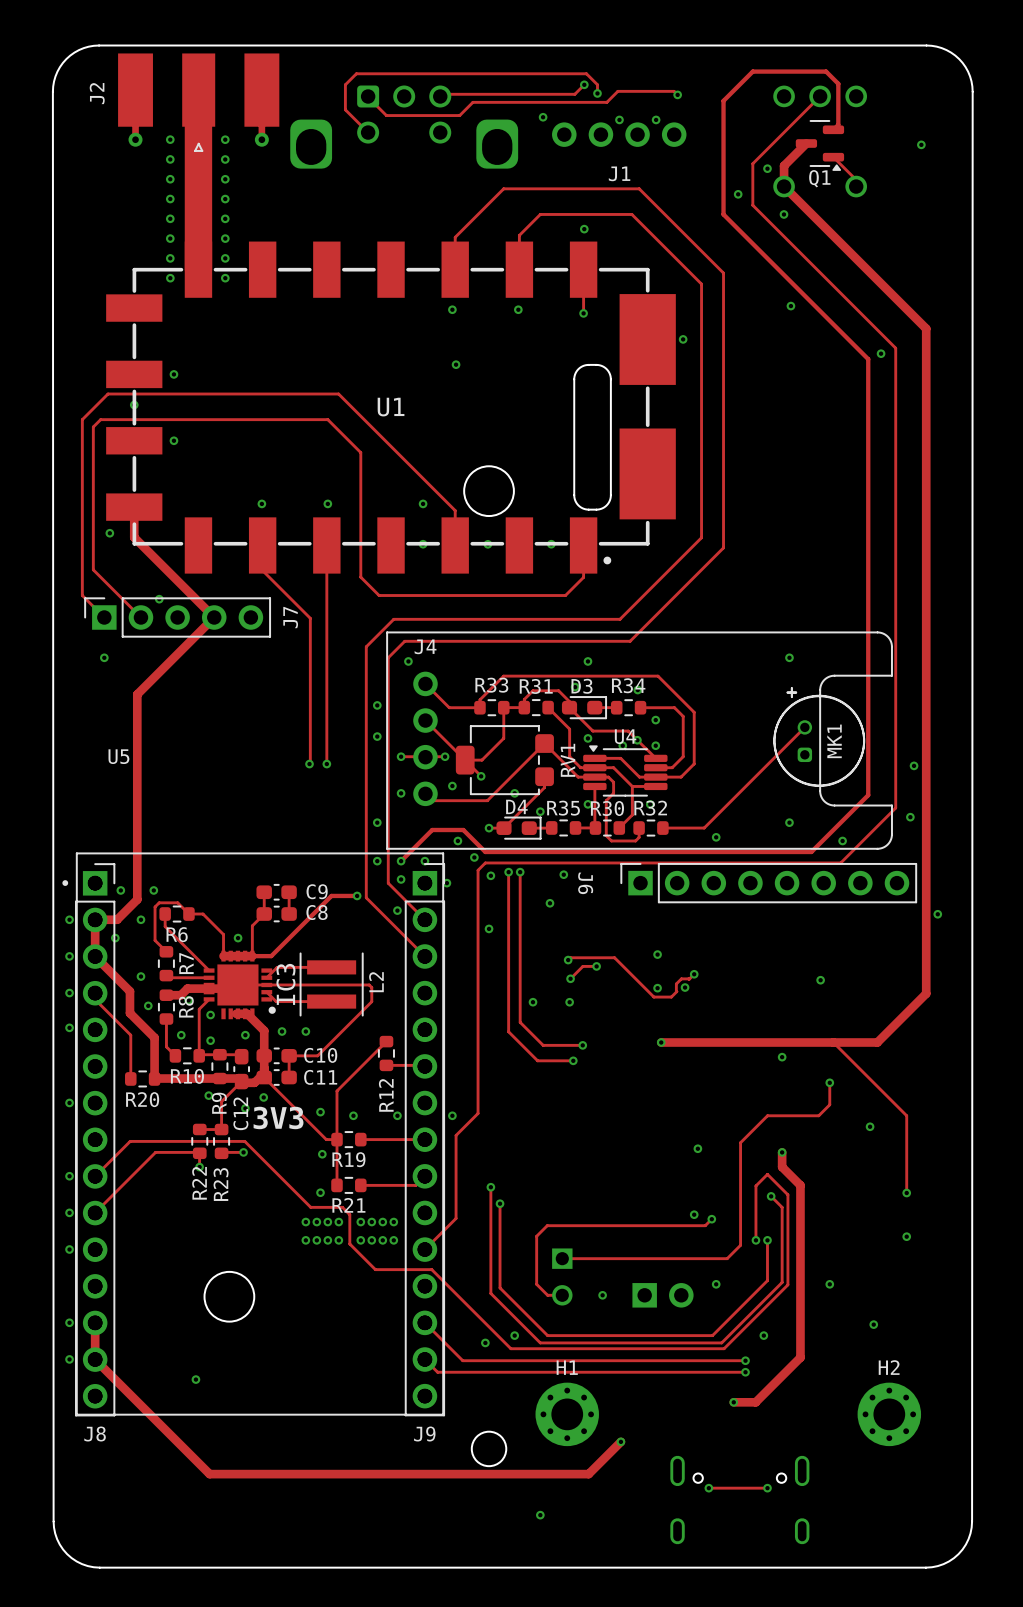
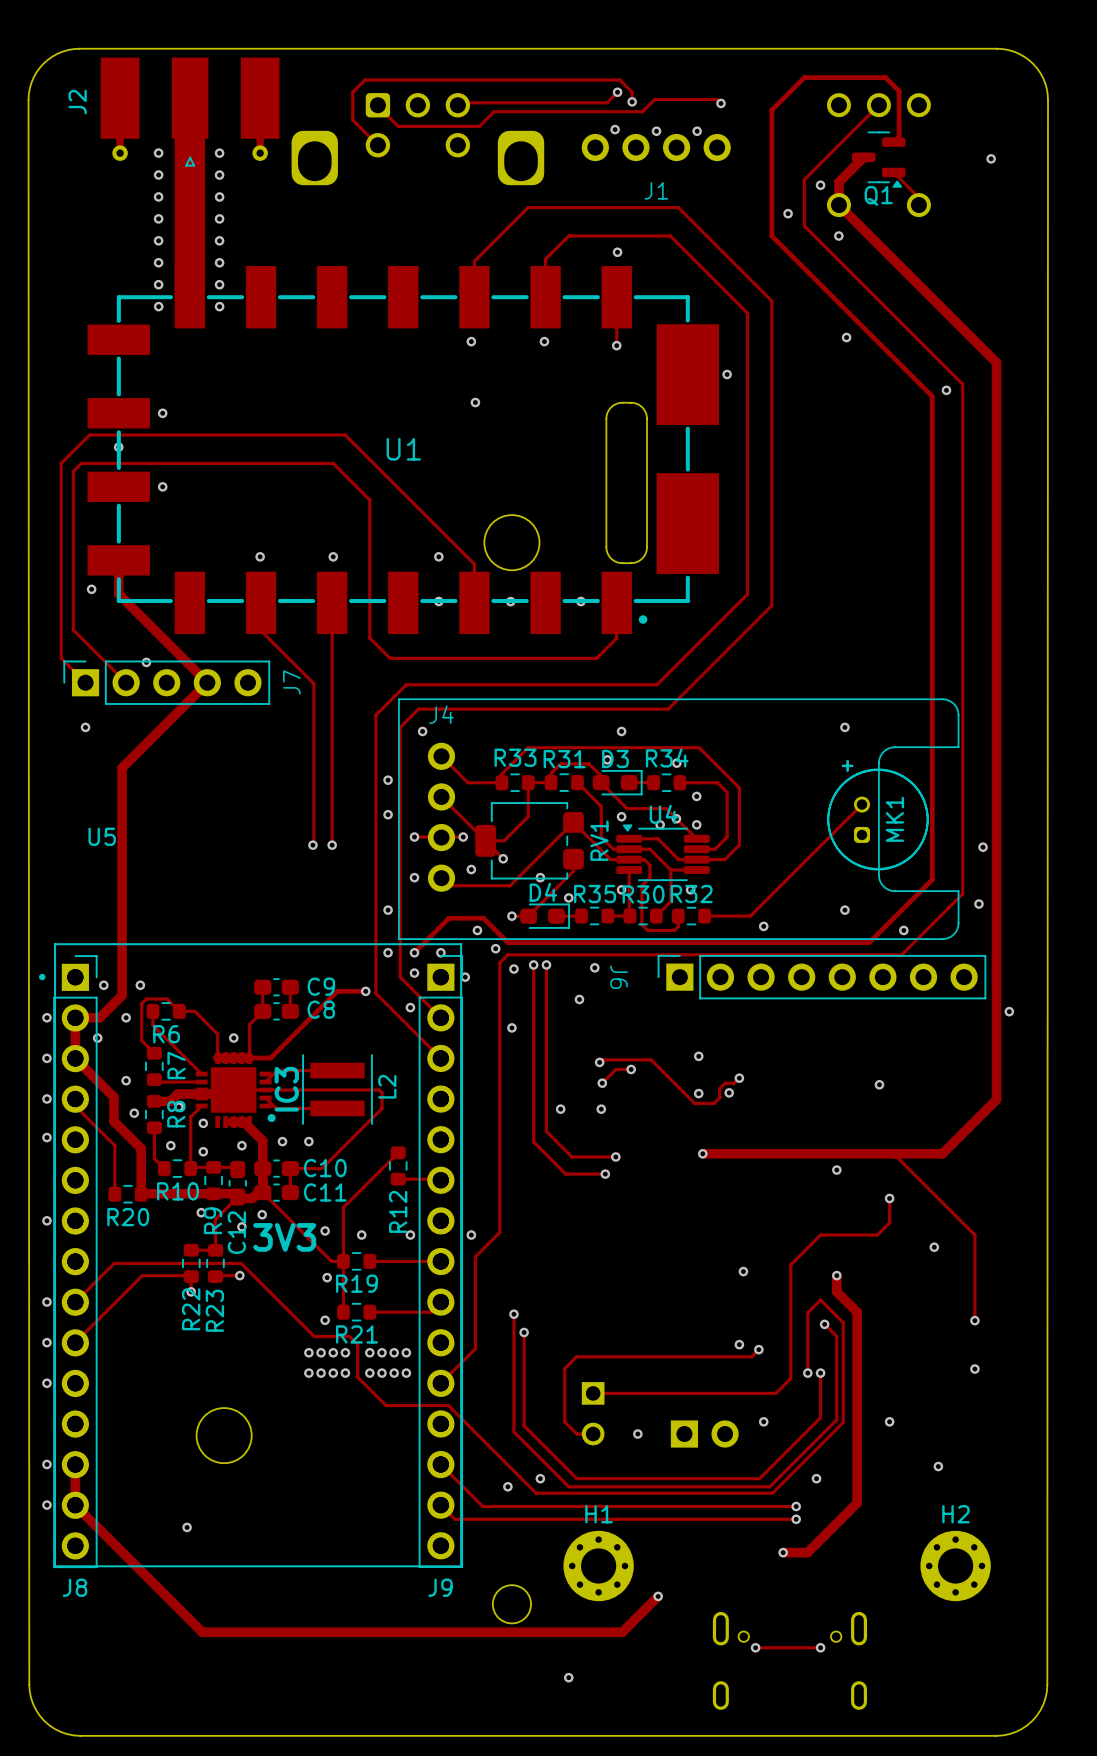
via position: (543, 117) -> (615, 129)

